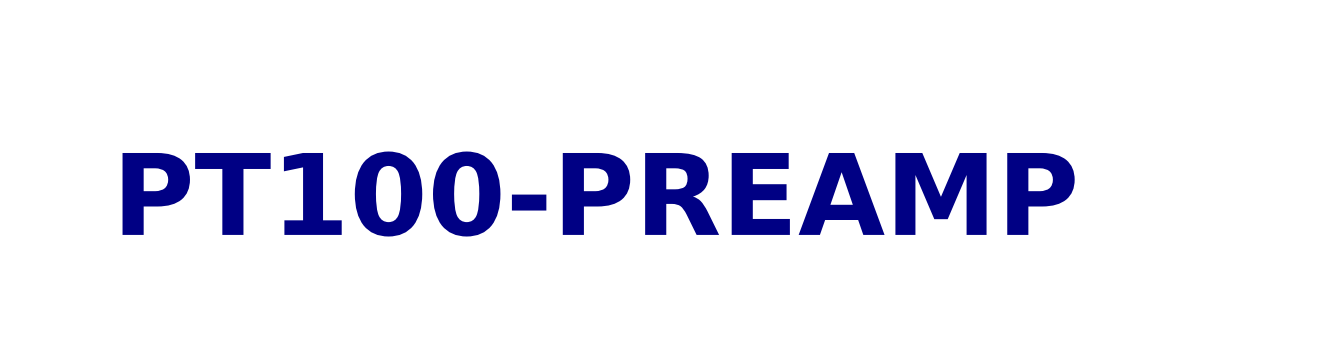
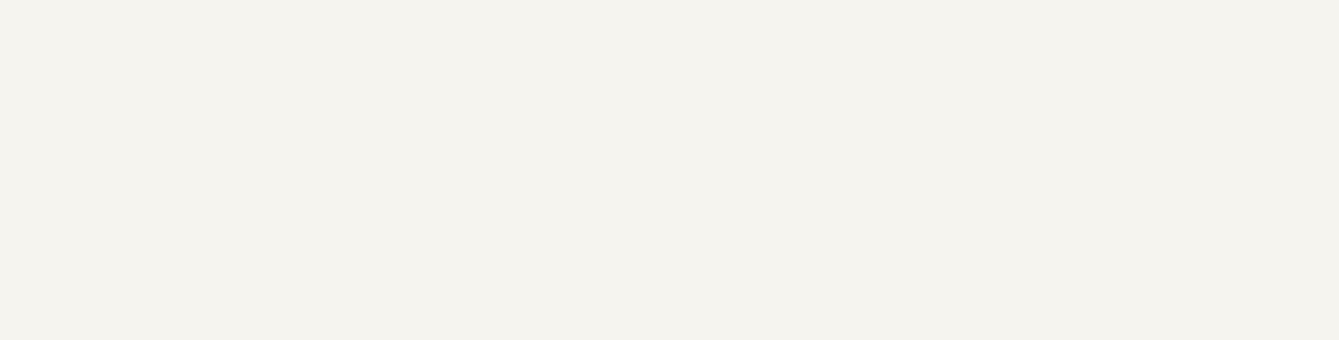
text: PT100-PREAMP (598, 194) -> none

